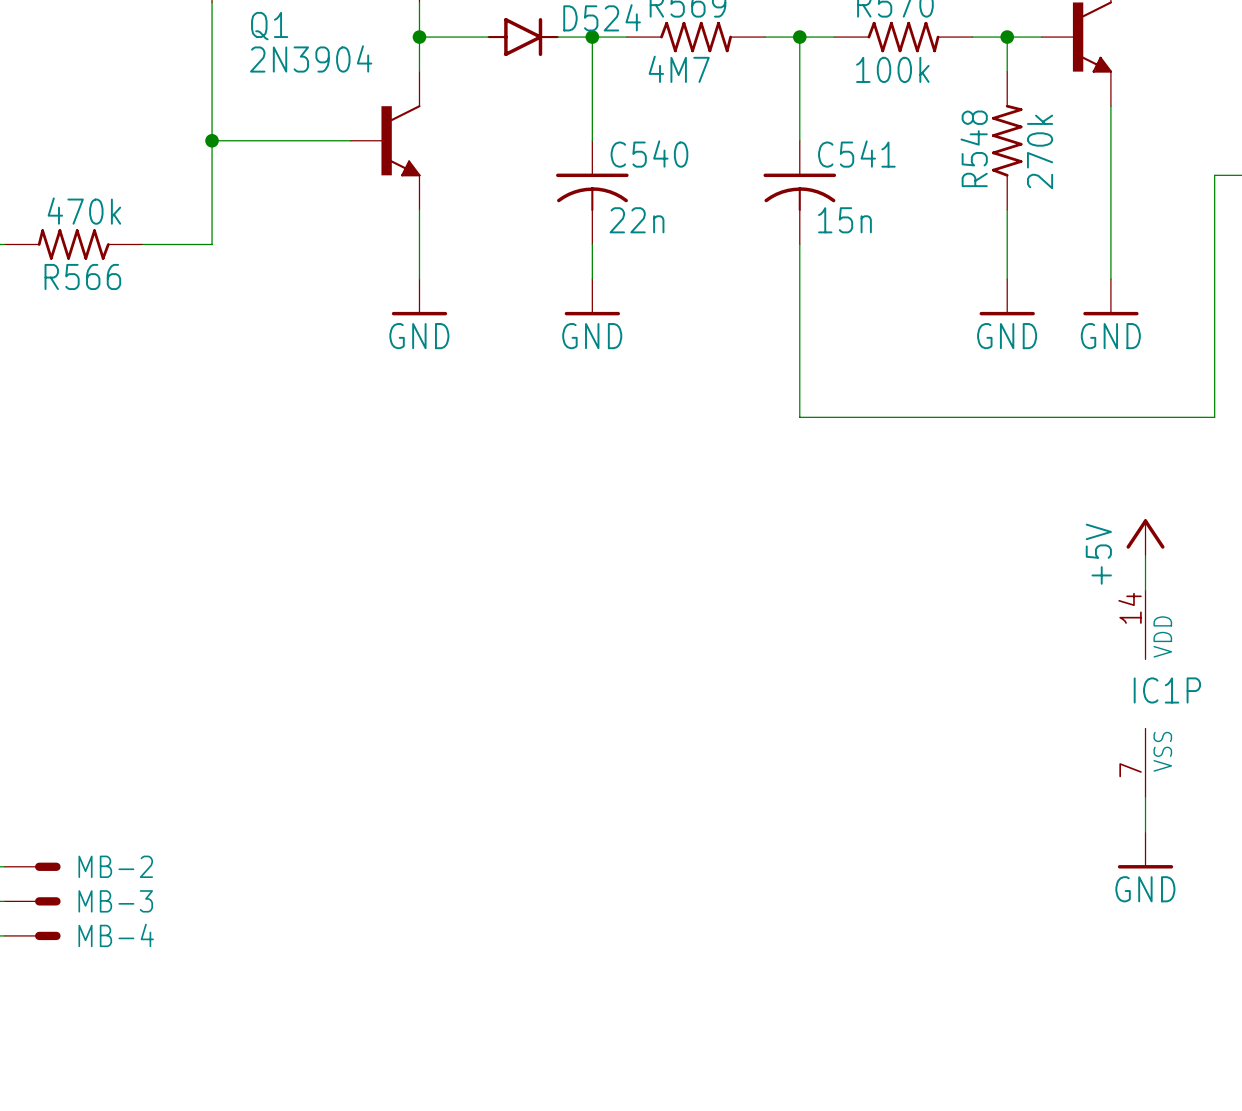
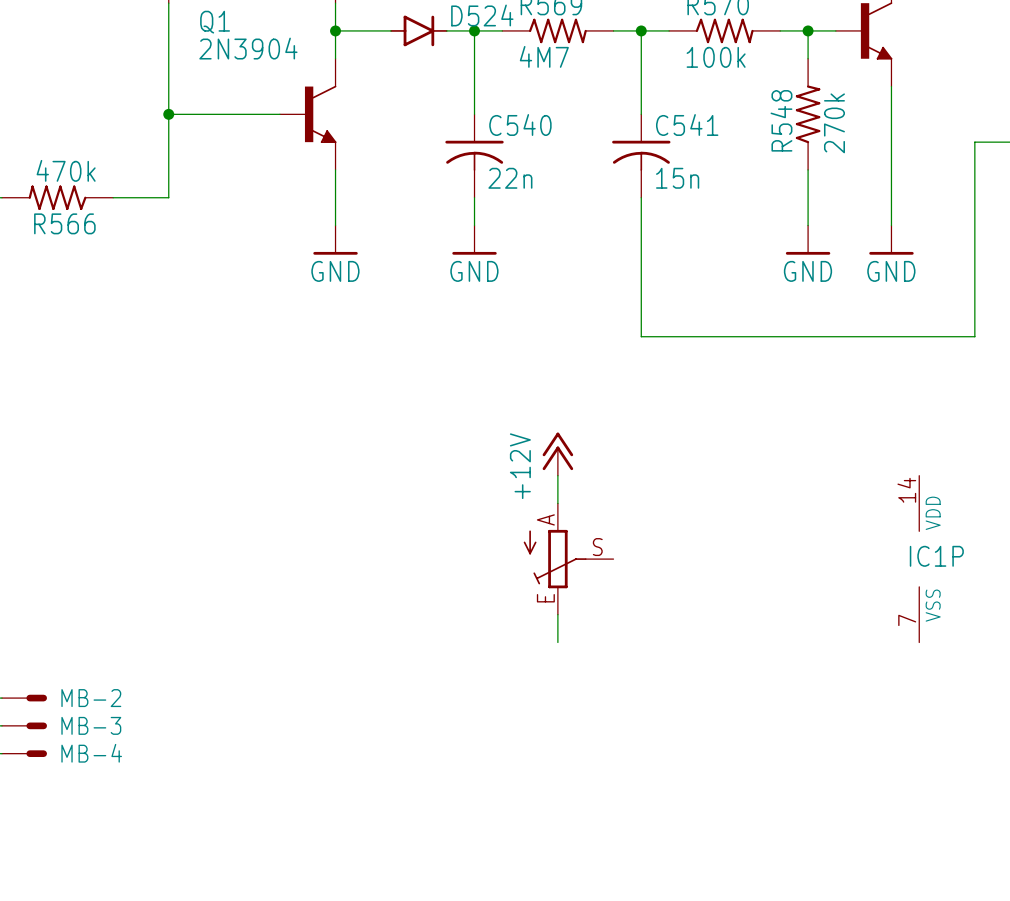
power symbol: +5V (1145, 537) -> none
wire: (1145, 555) (1145, 590) -> none
power symbol: none -> +12V (557, 454)
wire: none -> (557, 475) (557, 503)
part: none -> (568, 559)
wire: none -> (557, 614) (557, 642)
wire: (1145, 797) (1145, 832) -> none
power symbol: GND (1145, 850) -> none

